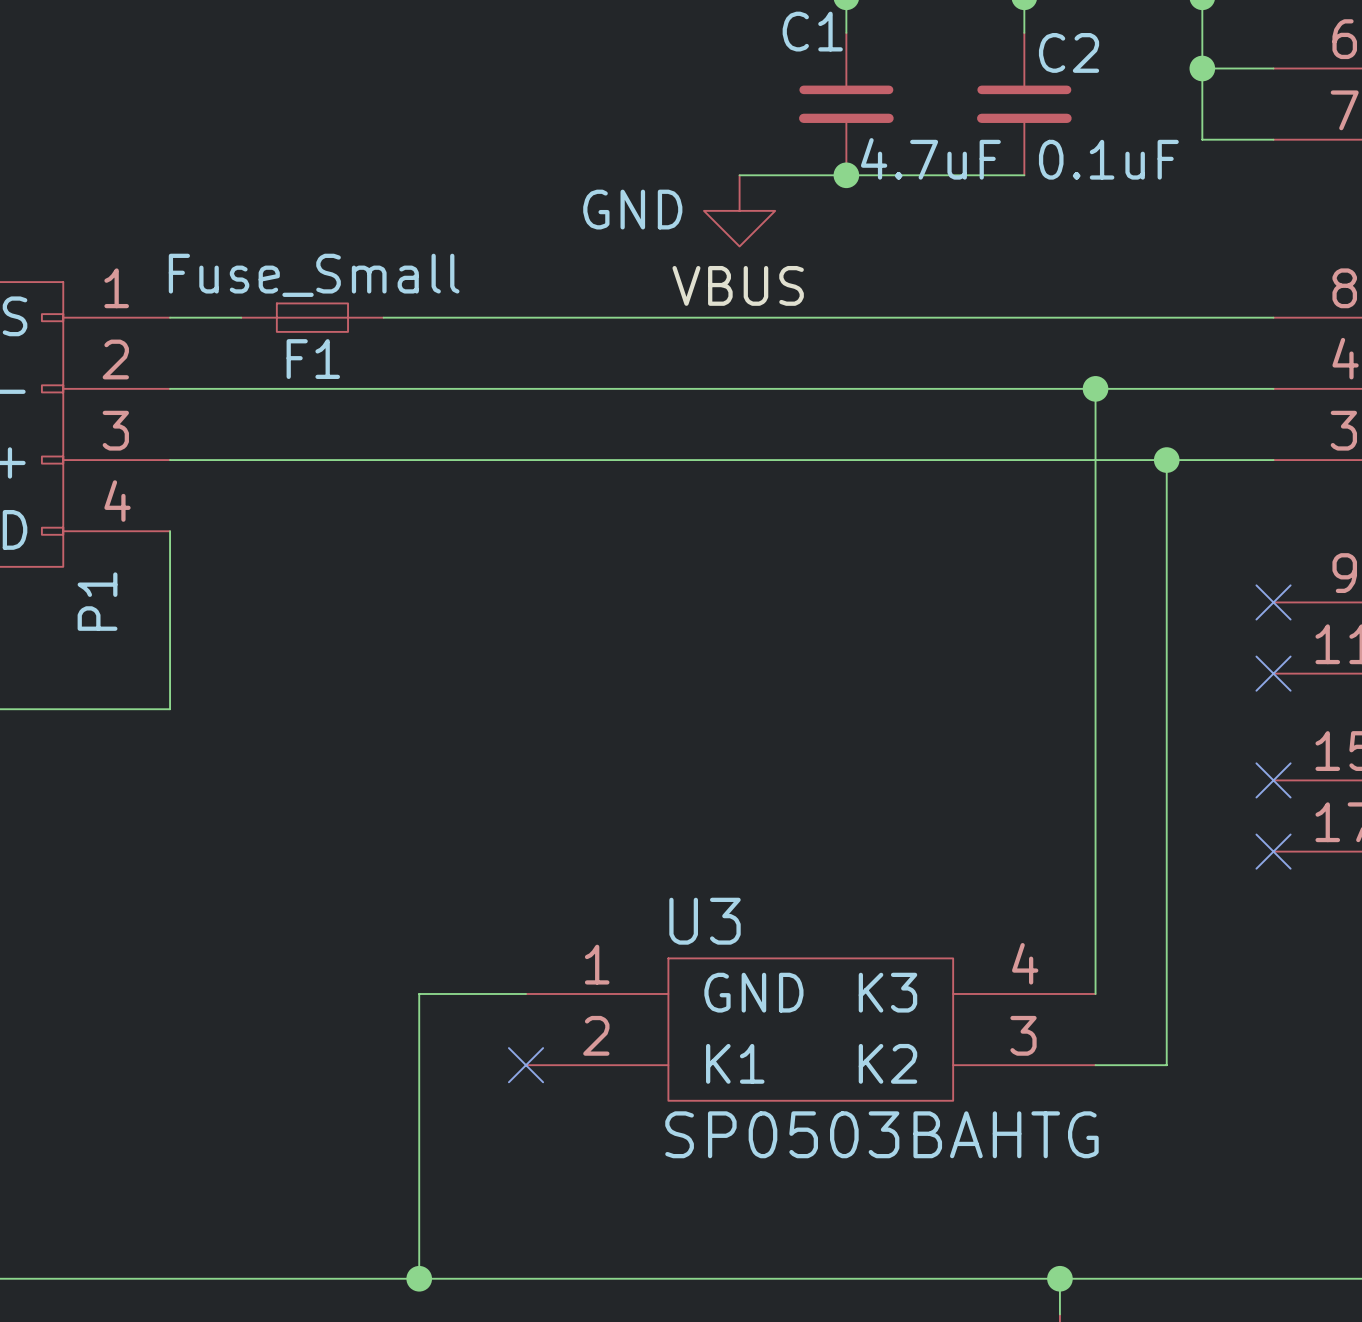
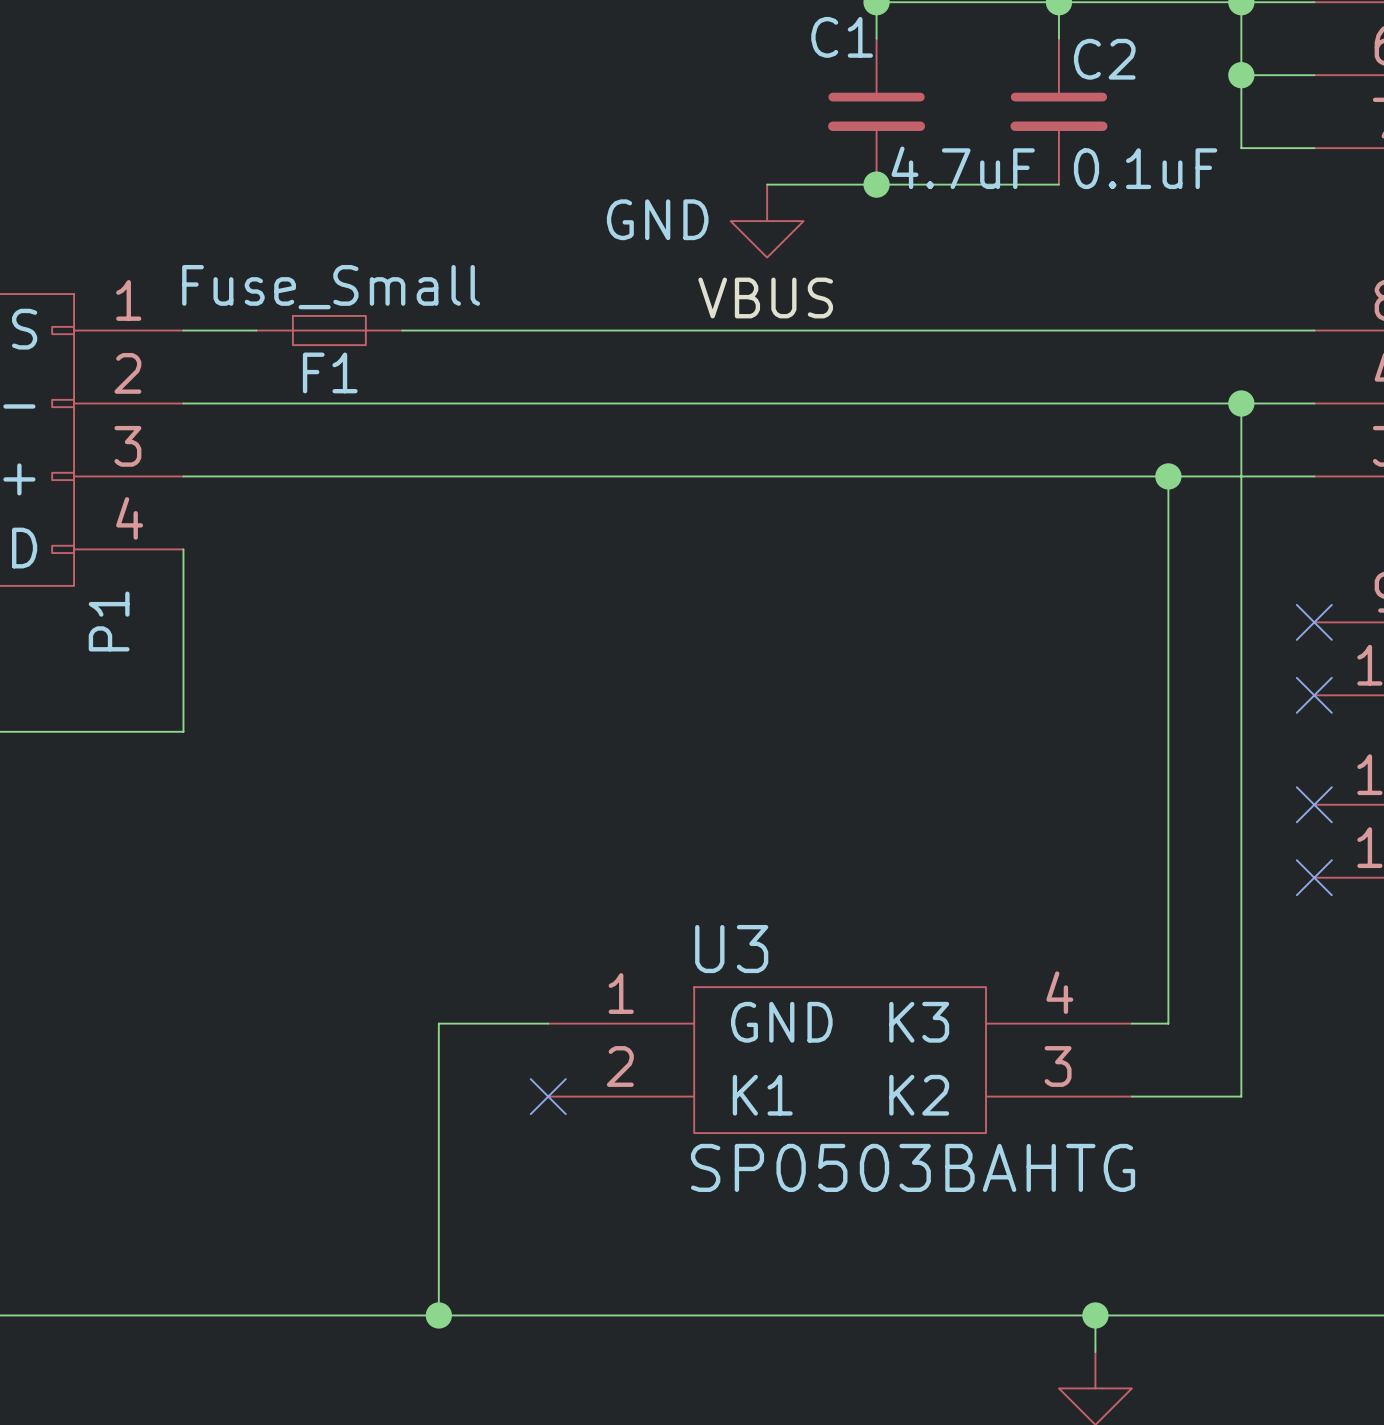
wire: (1095, 388) (1095, 993) -> (1168, 476) (1168, 1023) (1131, 1023)
junction: (1095, 388) -> none
junction: none -> (1241, 403)
wire: (1166, 460) (1166, 1065) -> (1241, 403) (1241, 1096) (1204, 1096)
junction position: (1166, 460) -> (1168, 476)

